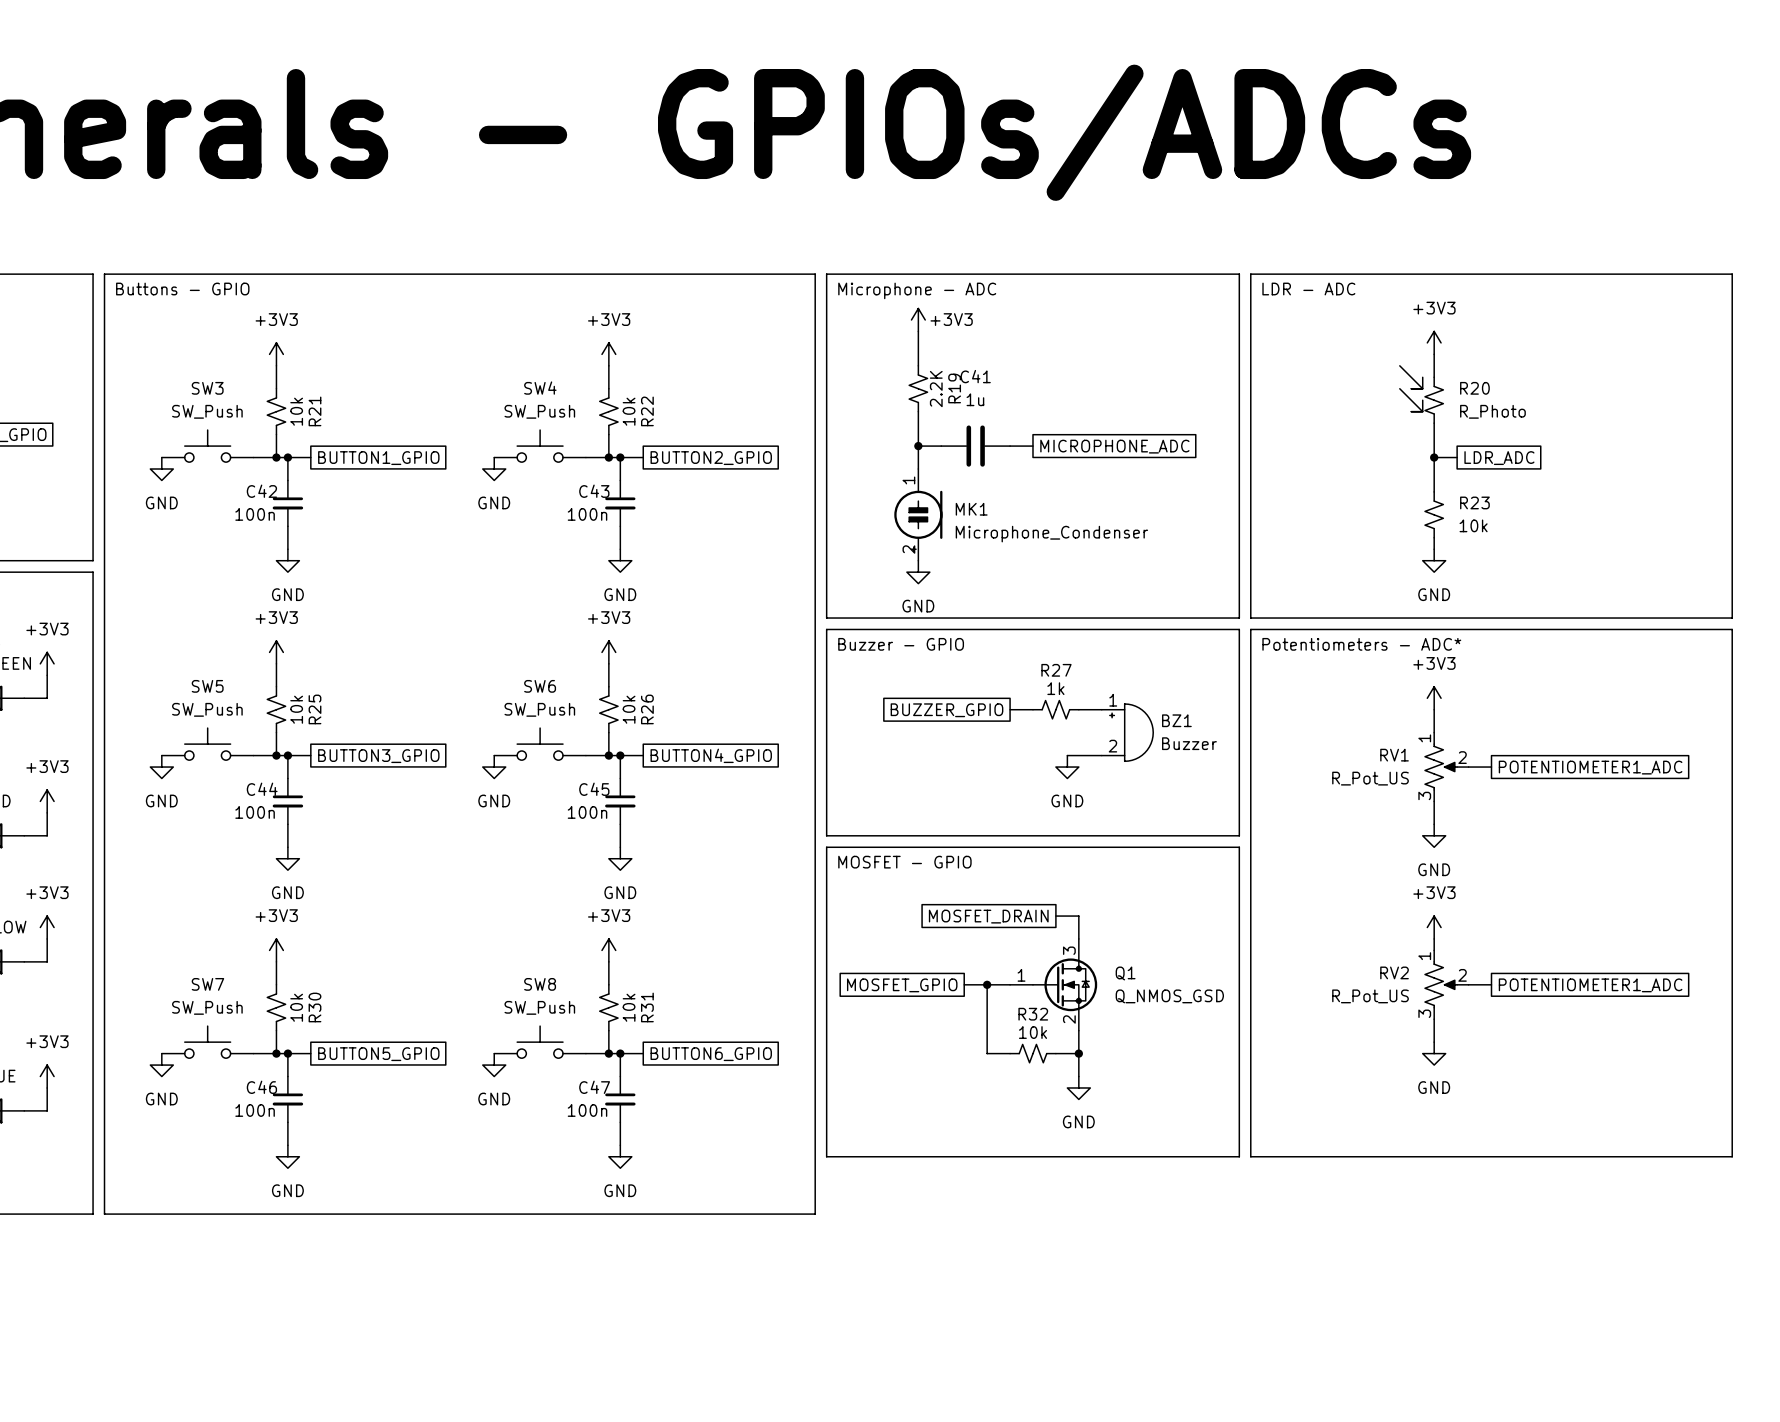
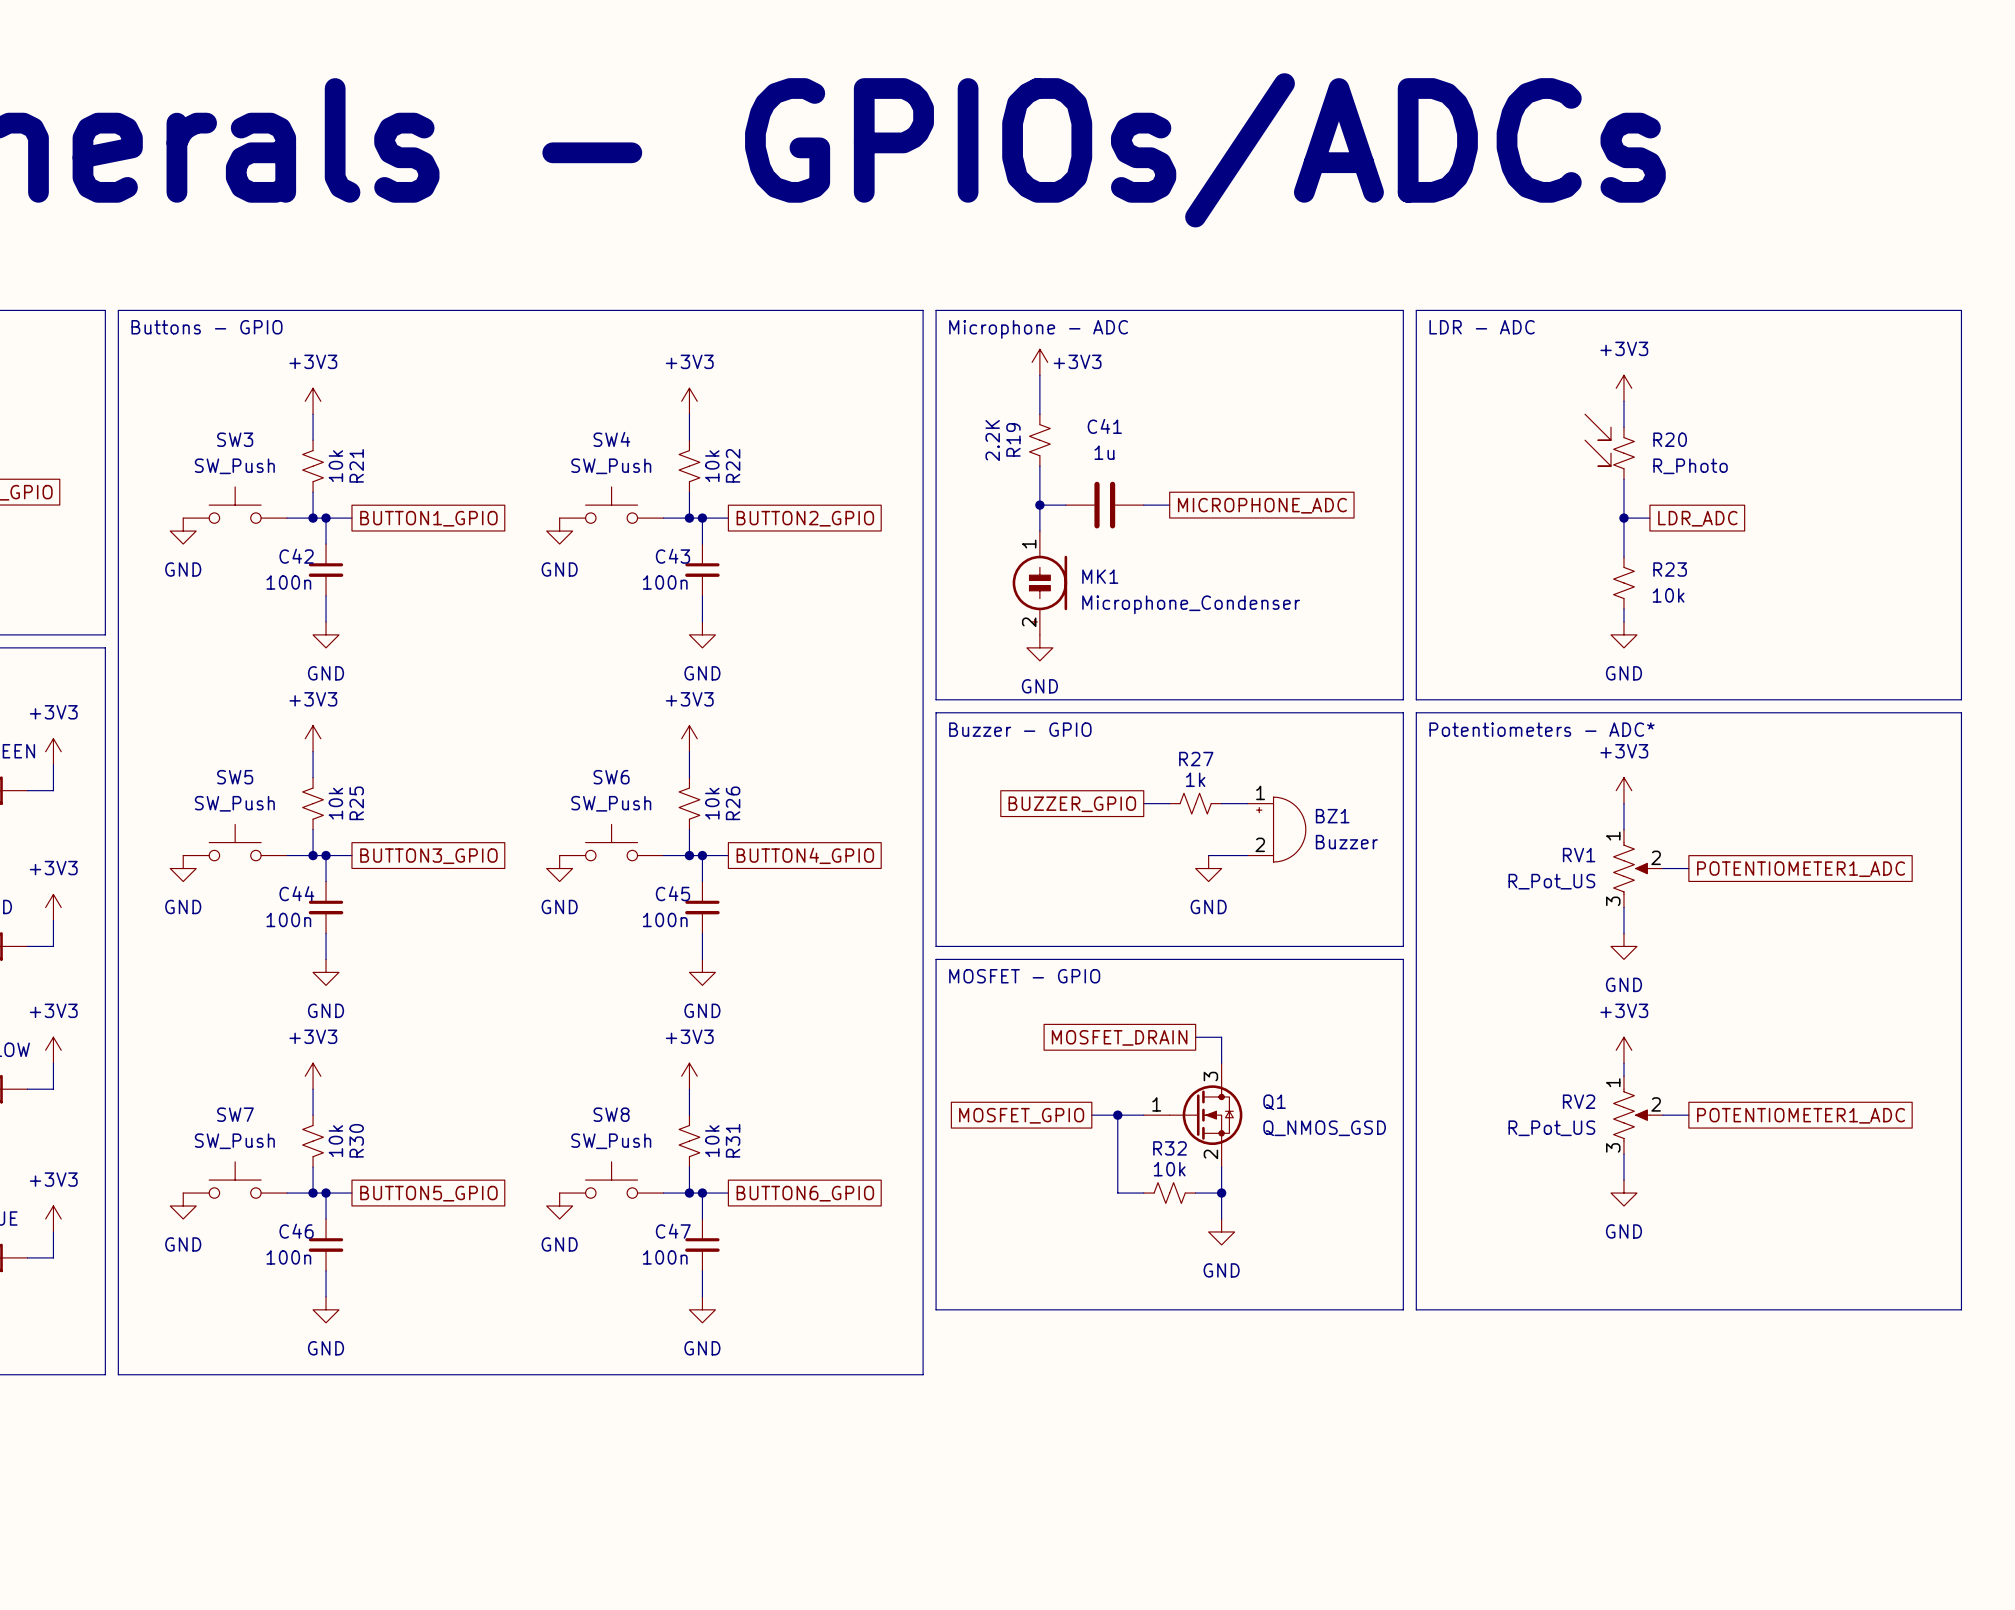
R19 name position: R19 (954, 388) -> R19 (1013, 439)
R19 value position: 2.2K (936, 389) -> 2.2K (992, 440)

